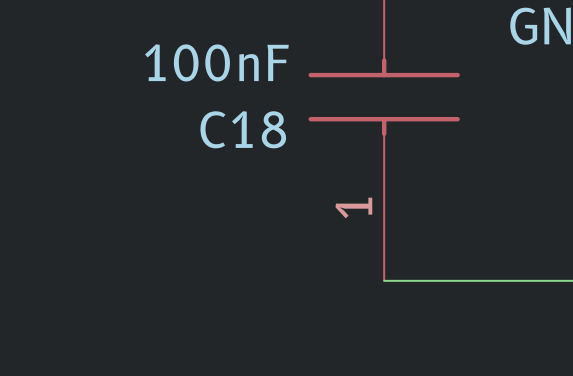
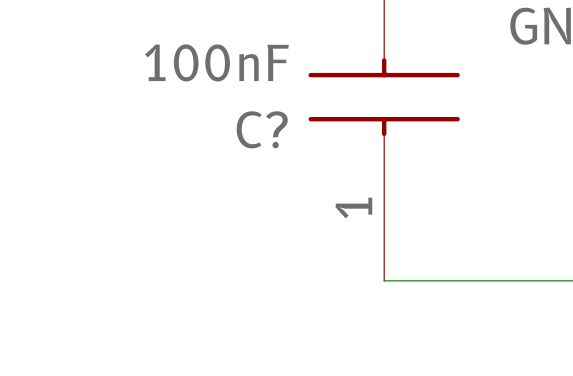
C18 name: C18 (243, 129) -> C? (262, 129)

